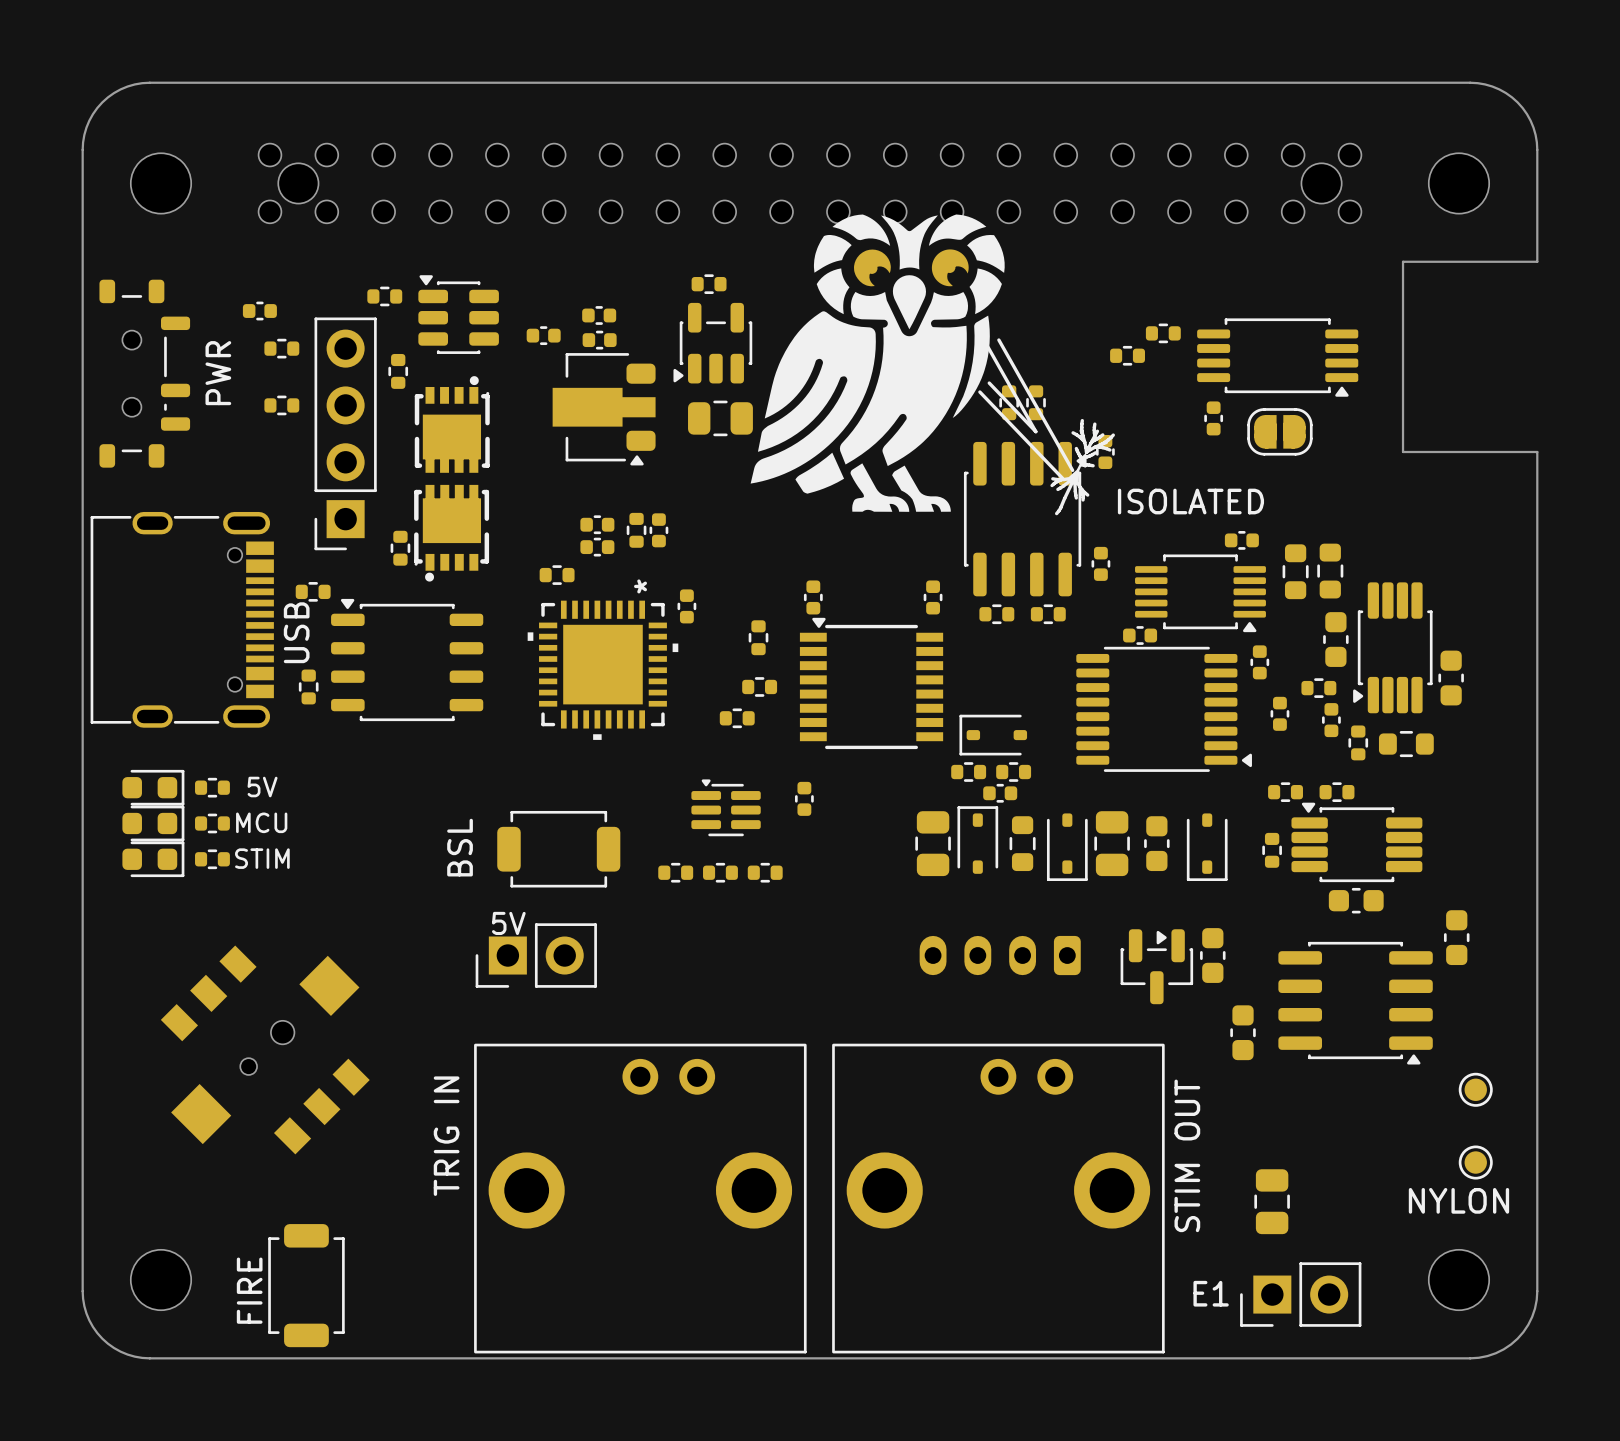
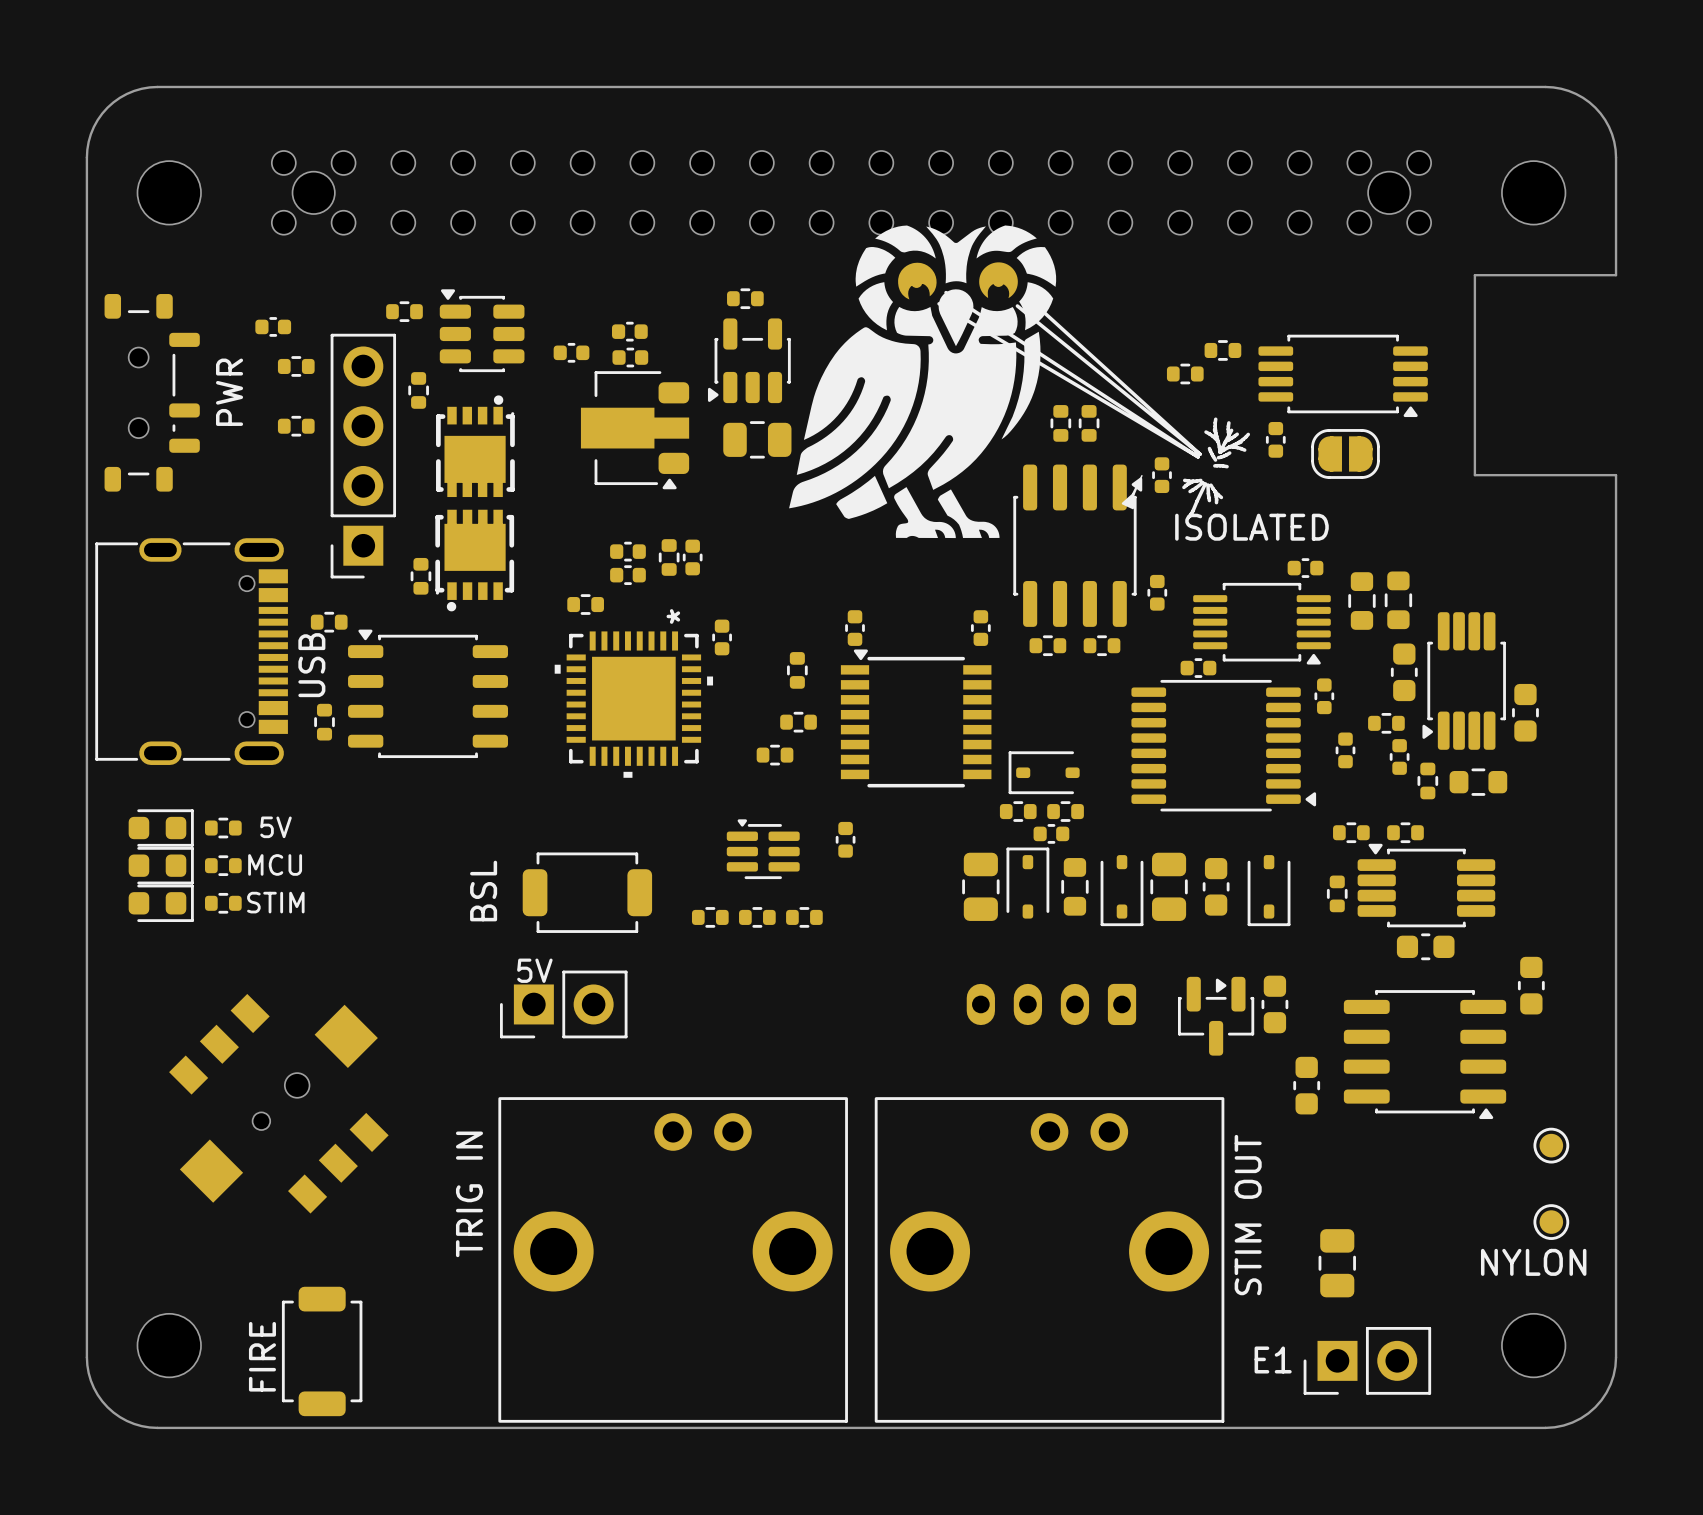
part: none -> (1019, 381)
part: (932, 364) -> none

